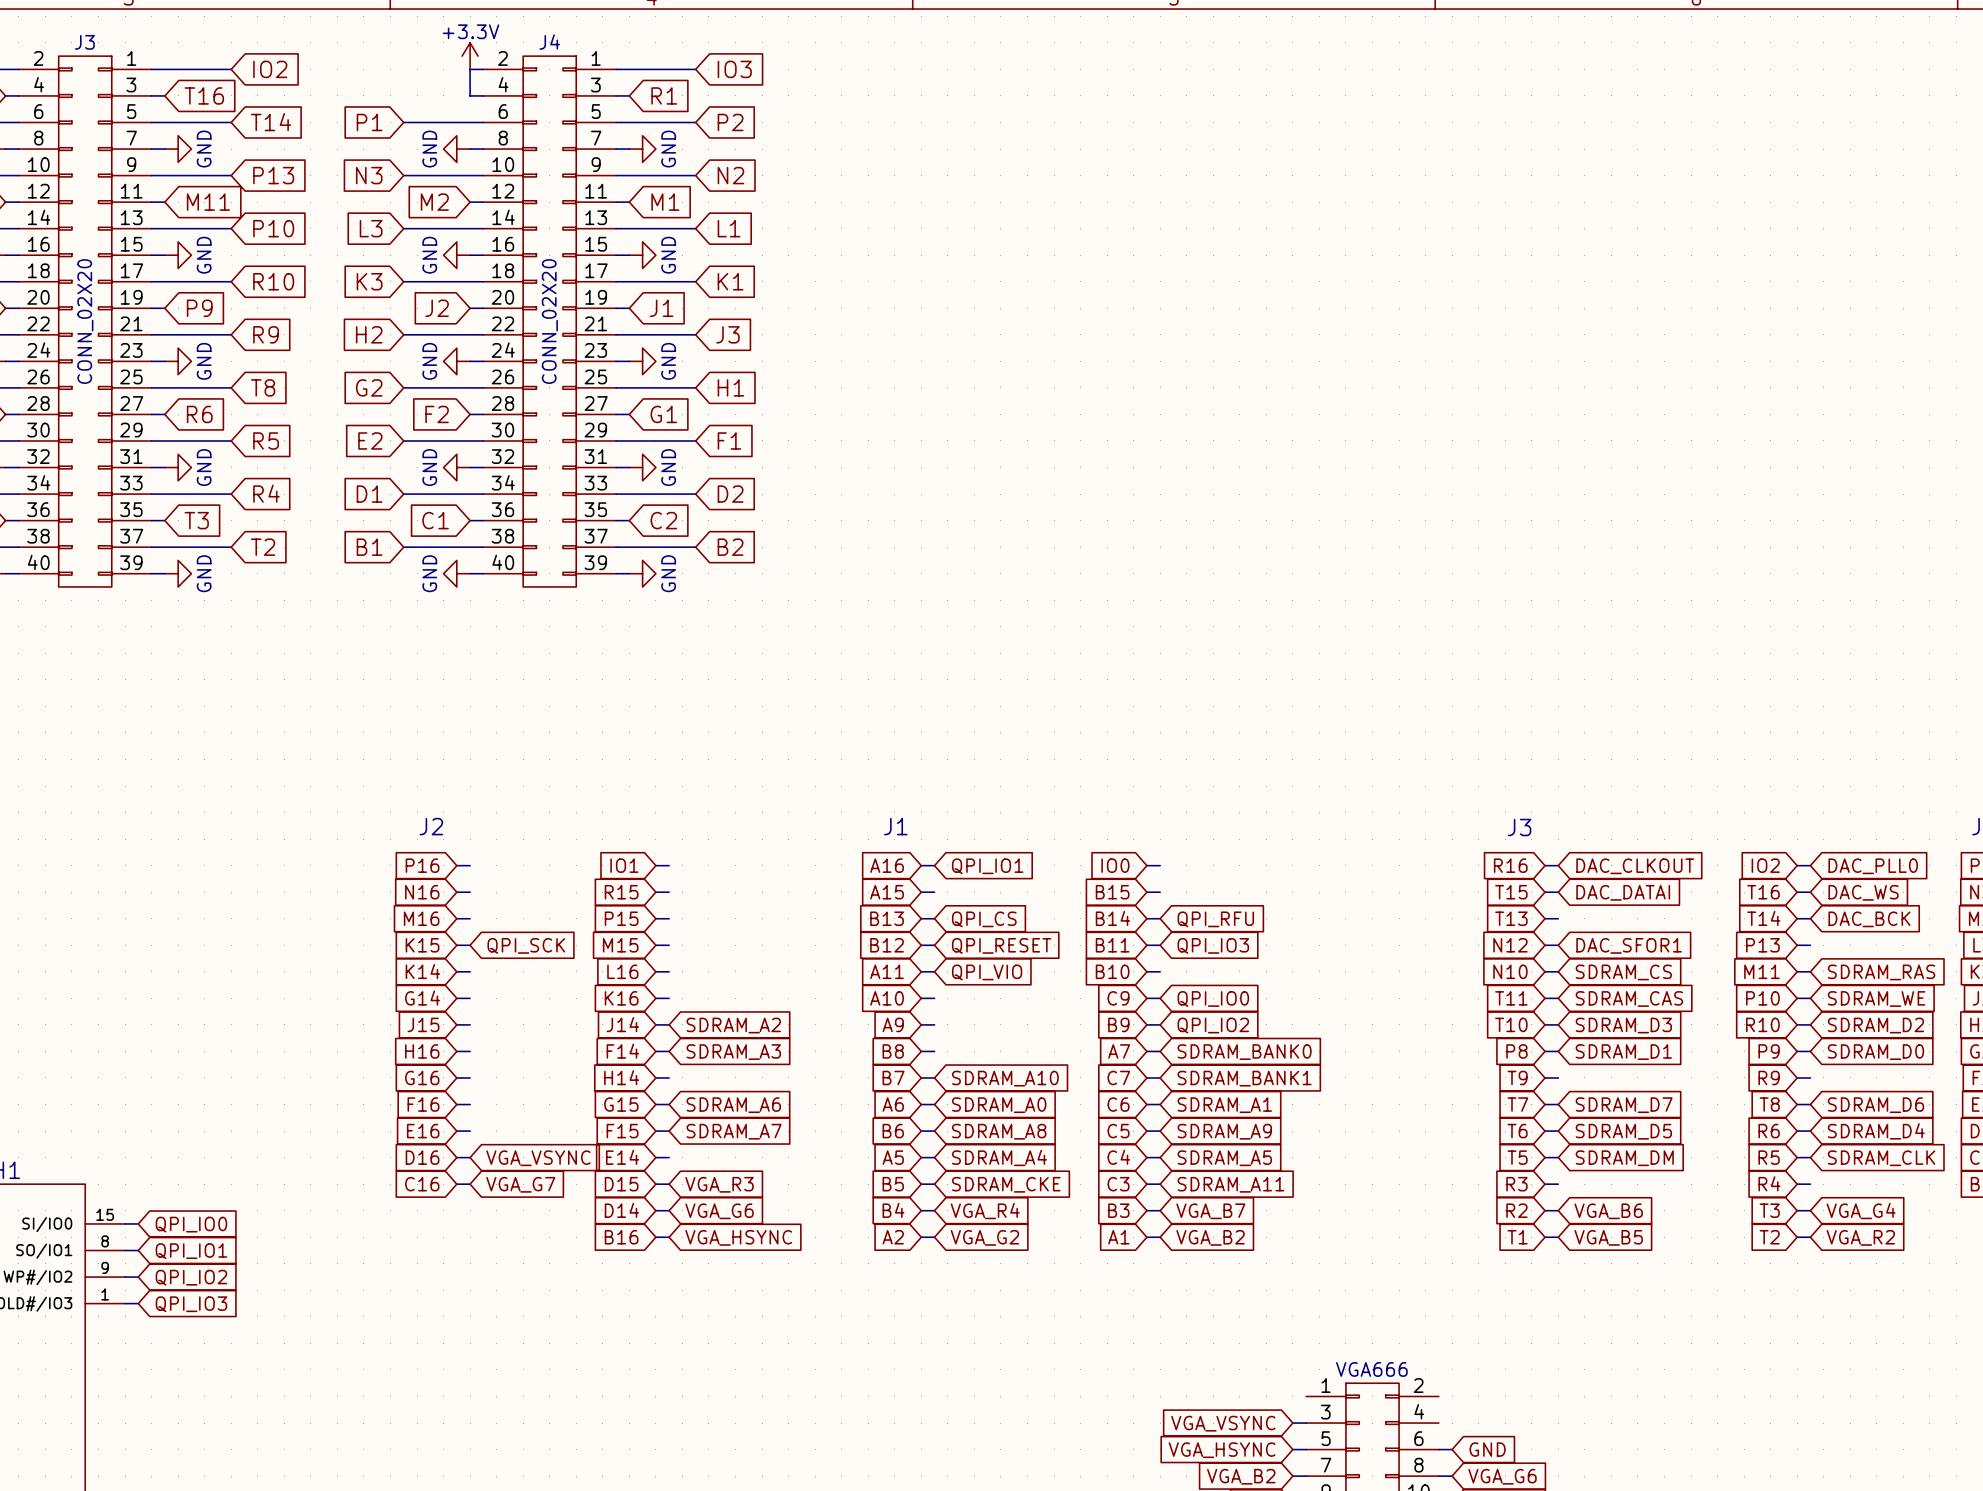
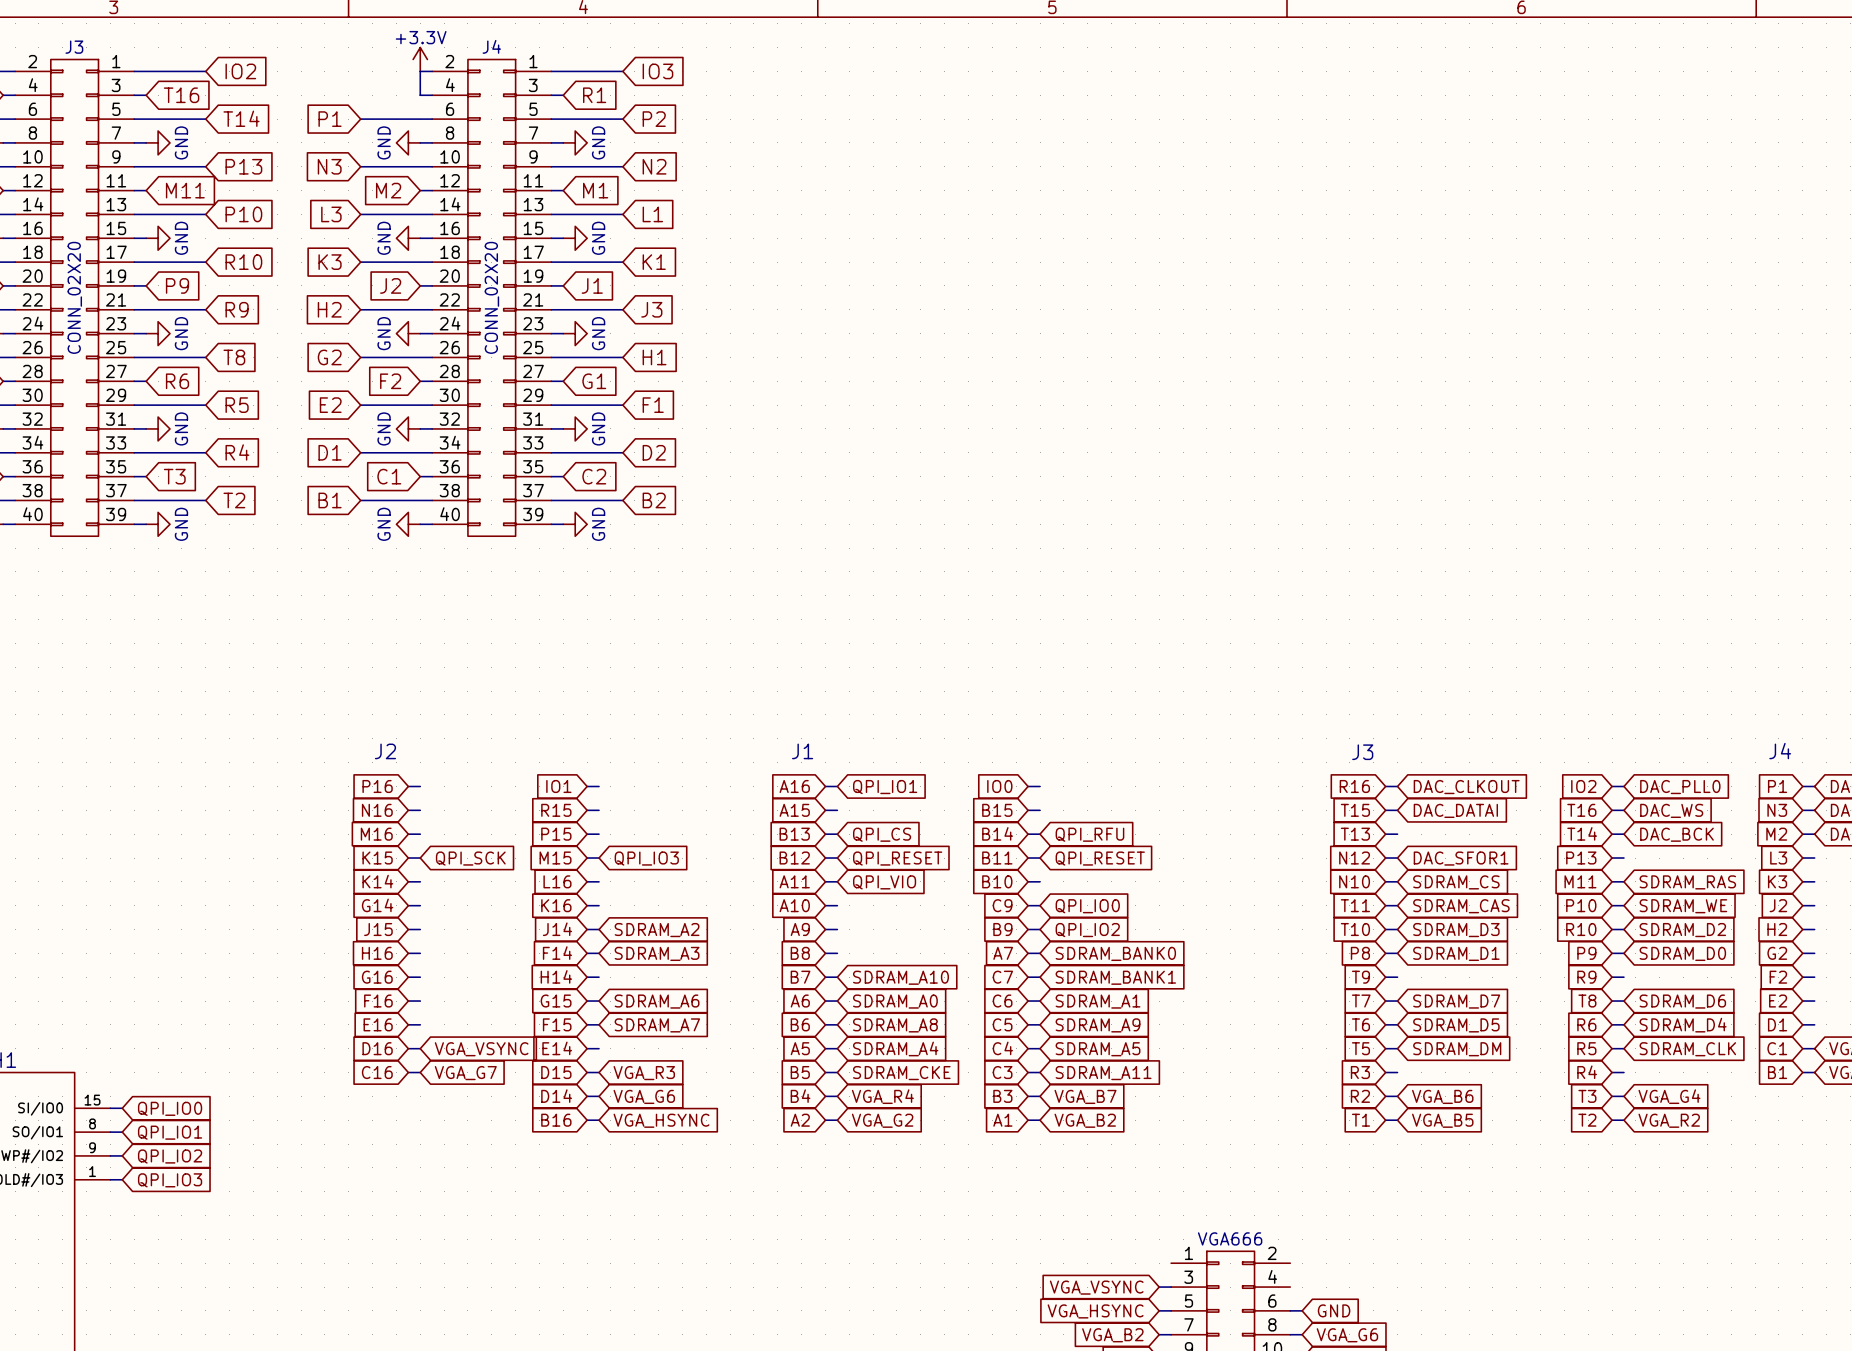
global label: none -> QPI_IO3 (646, 858)
global label: QPI_IO3 (1213, 945) -> QPI_RESET (1100, 858)

